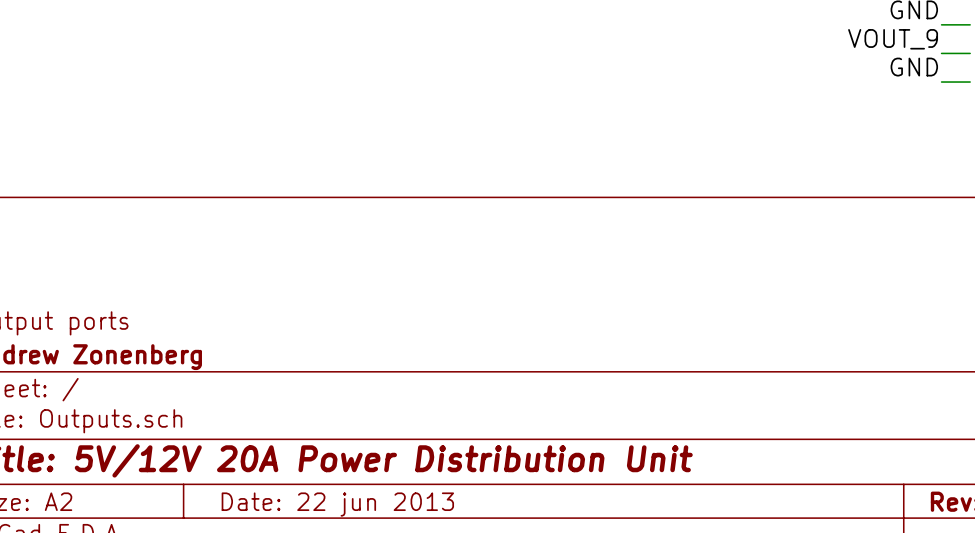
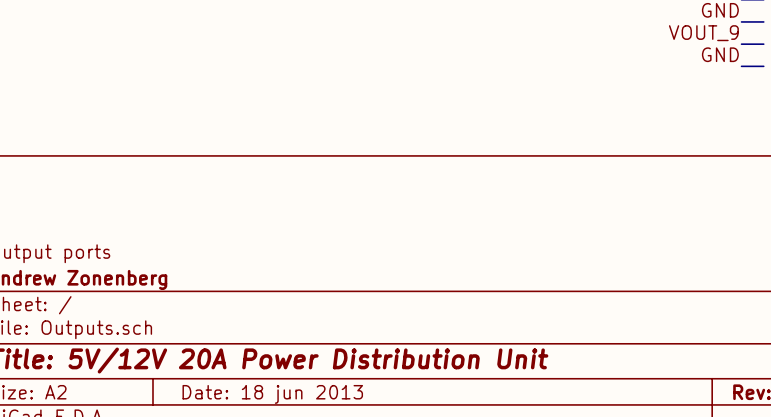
title block: Date: 22 jun 2013 (337, 504) -> Date: 18 jun 2013 (272, 394)

